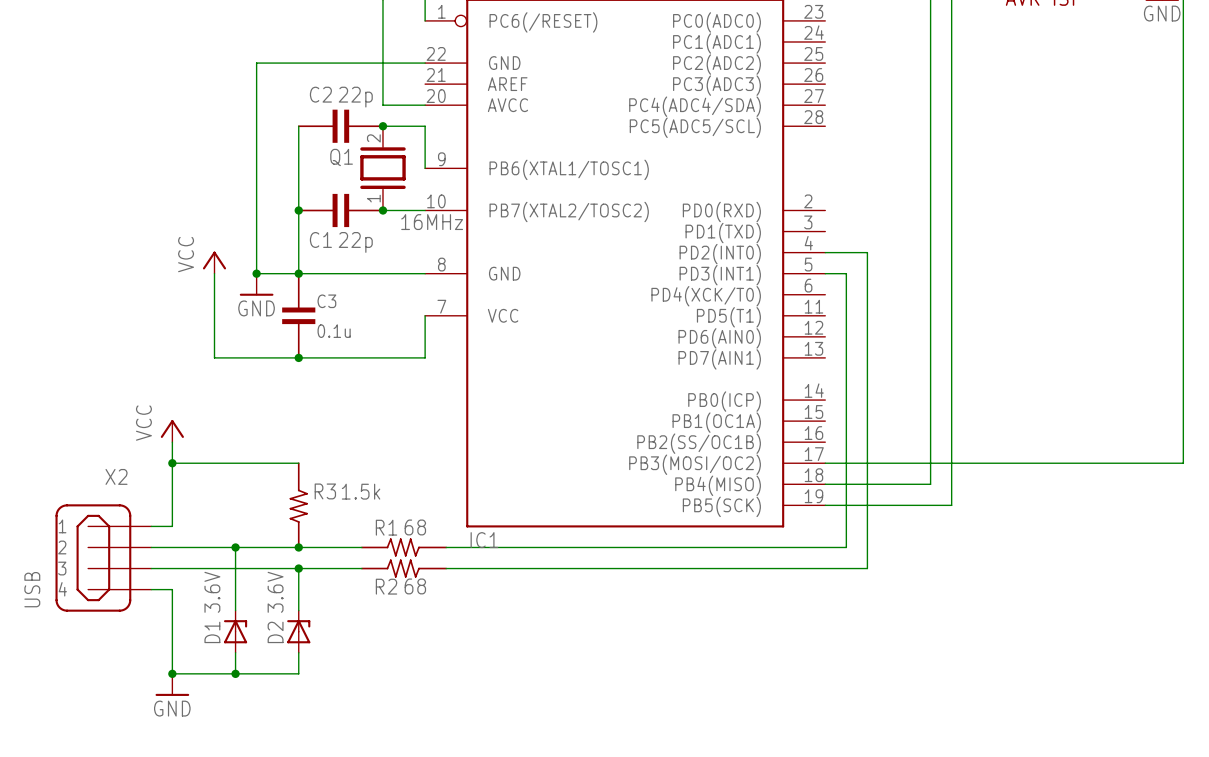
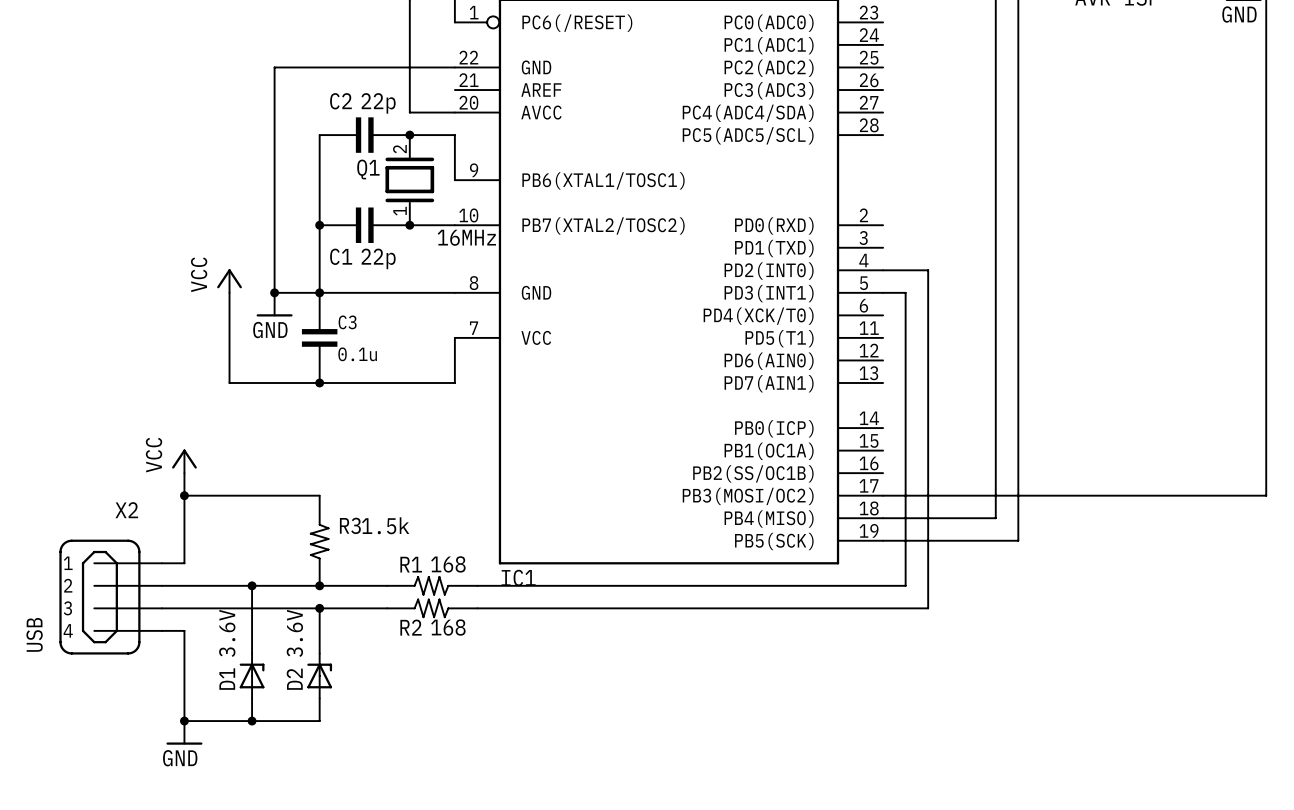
R1 value: 68 (415, 527) -> 168 (448, 564)
R2 value: 68 (415, 586) -> 168 (448, 627)

